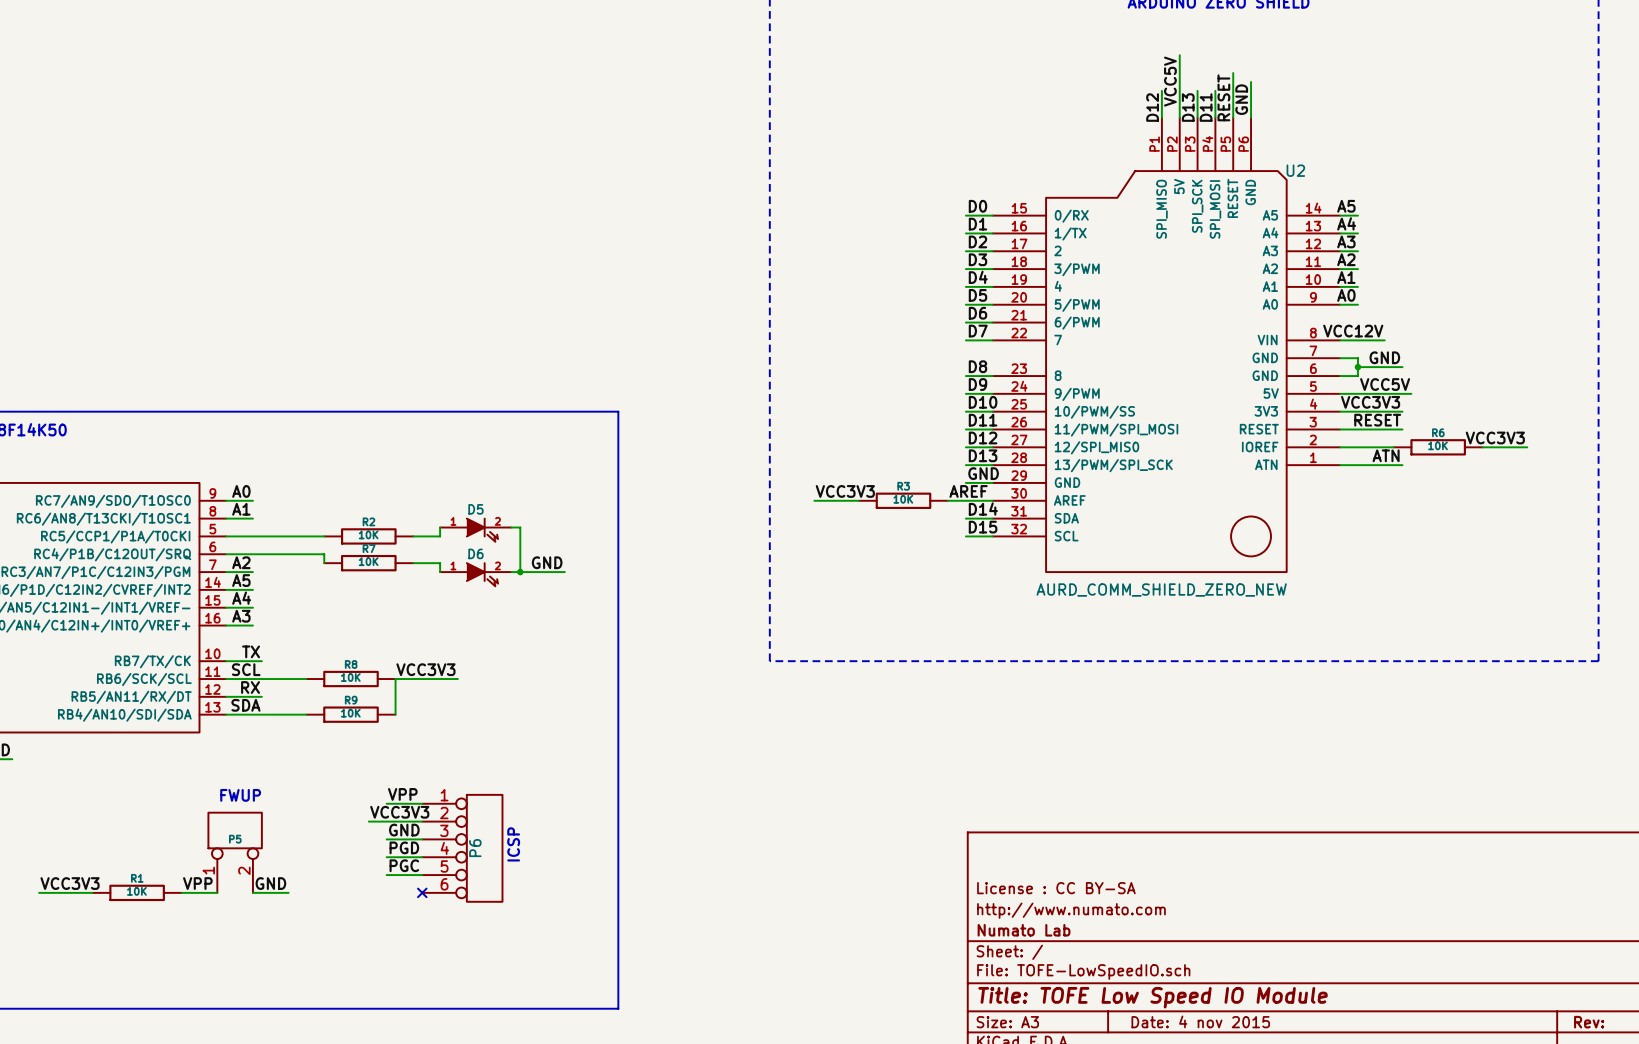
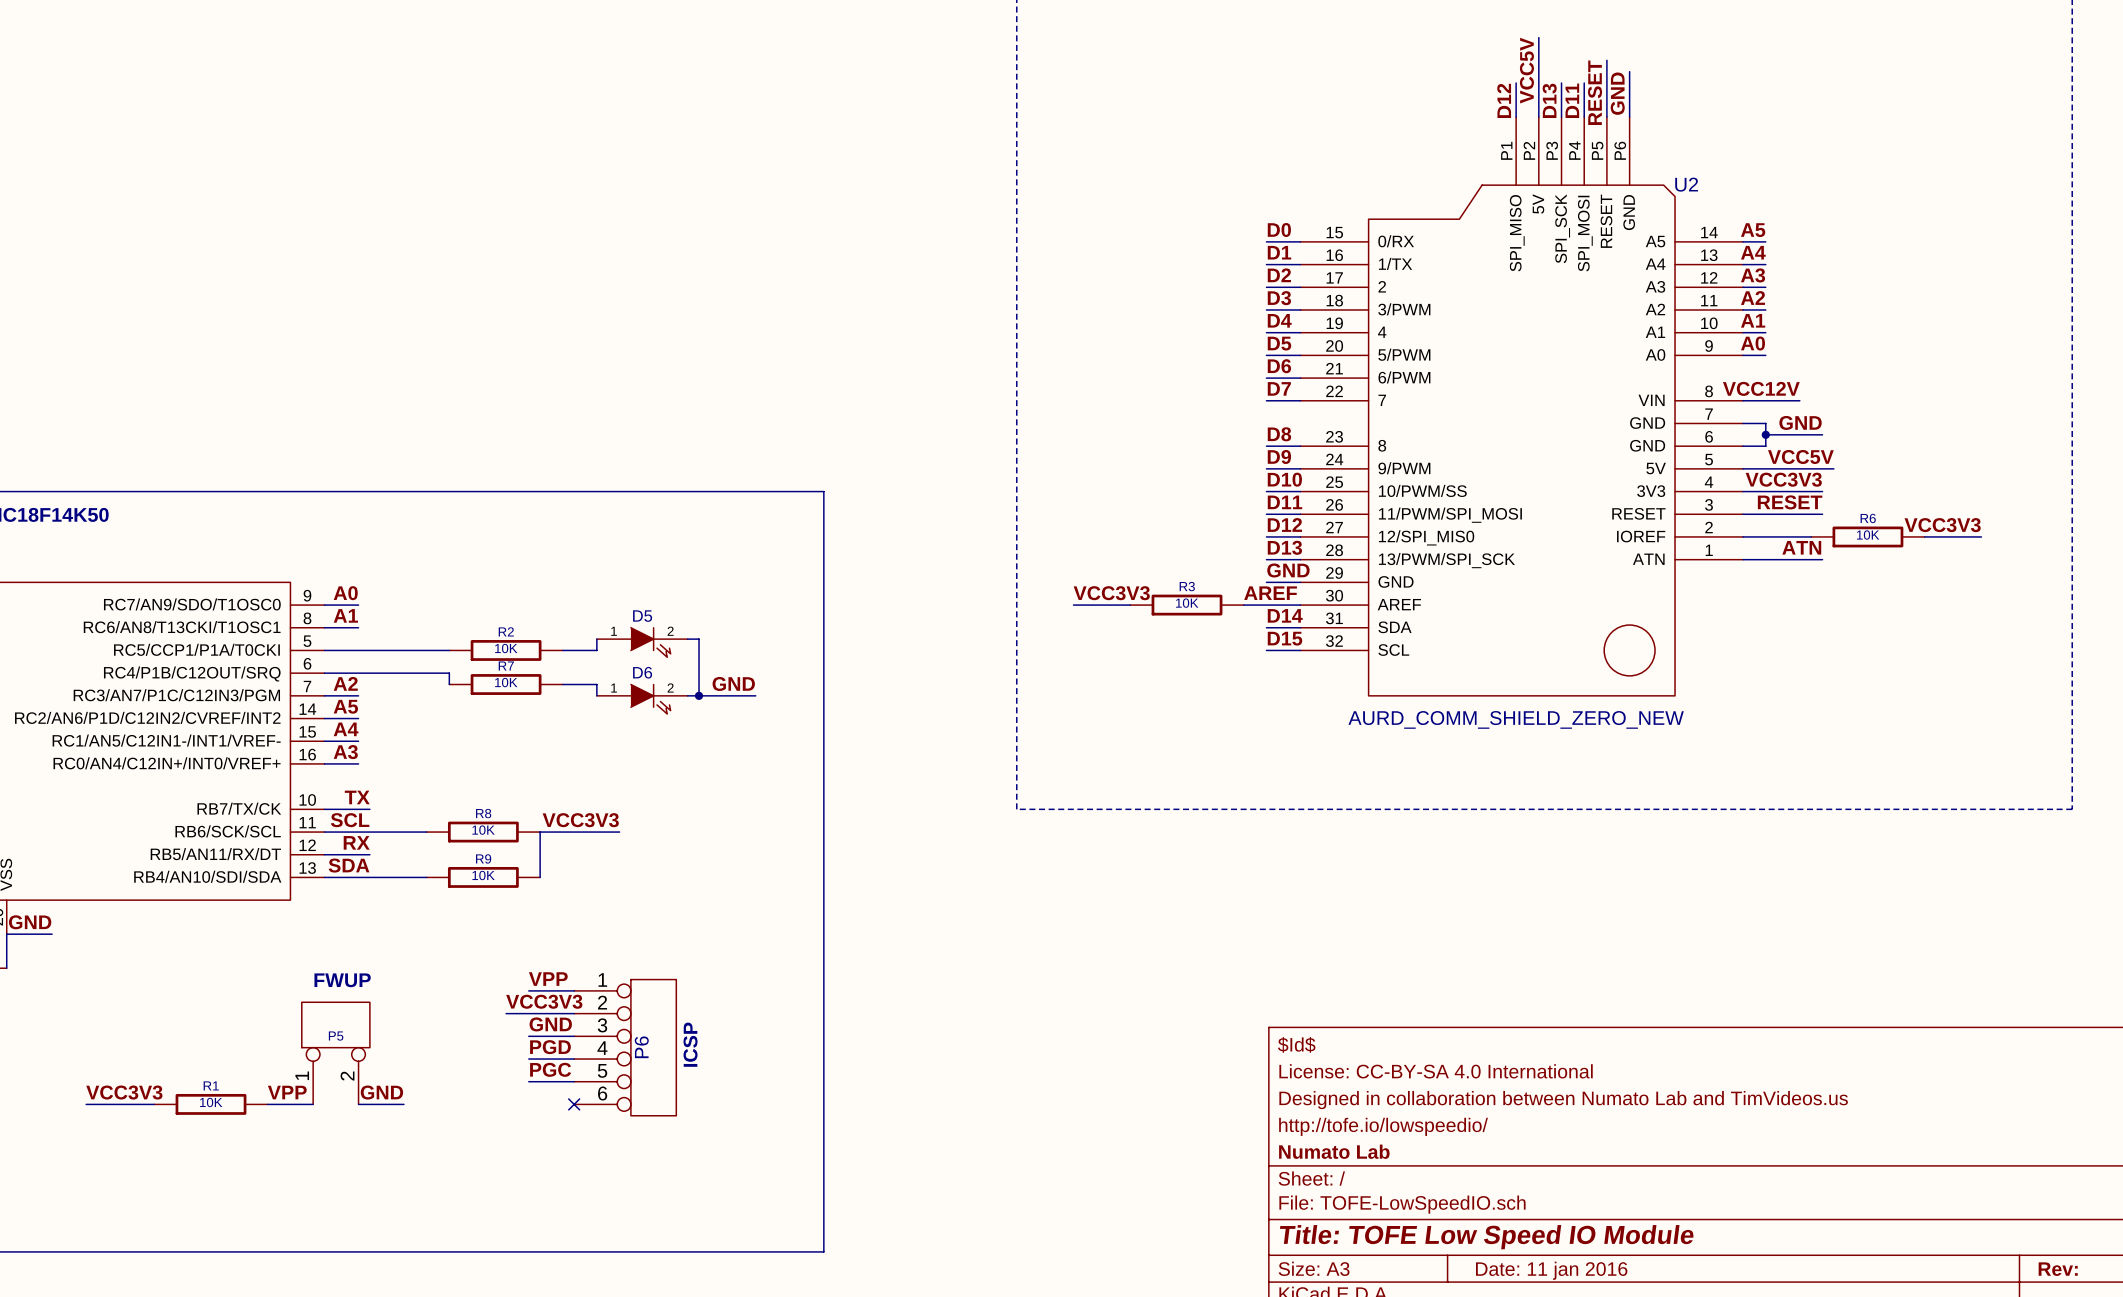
title block: none -> $Id$ (1296, 1044)
title block: none -> License: CC-BY-SA 4.0 International (1436, 1071)
title block: License : CC BY-SA (1056, 888) -> Designed in collaboration between Numato Lab and TimVideos.us (1563, 1100)
title block: http://www.numato.com (1071, 910) -> http://tofe.io/lowspeedio/ (1383, 1126)
title block: Date: 4 nov 2015 (1200, 1021) -> Date: 11 jan 2016 (1551, 1270)

